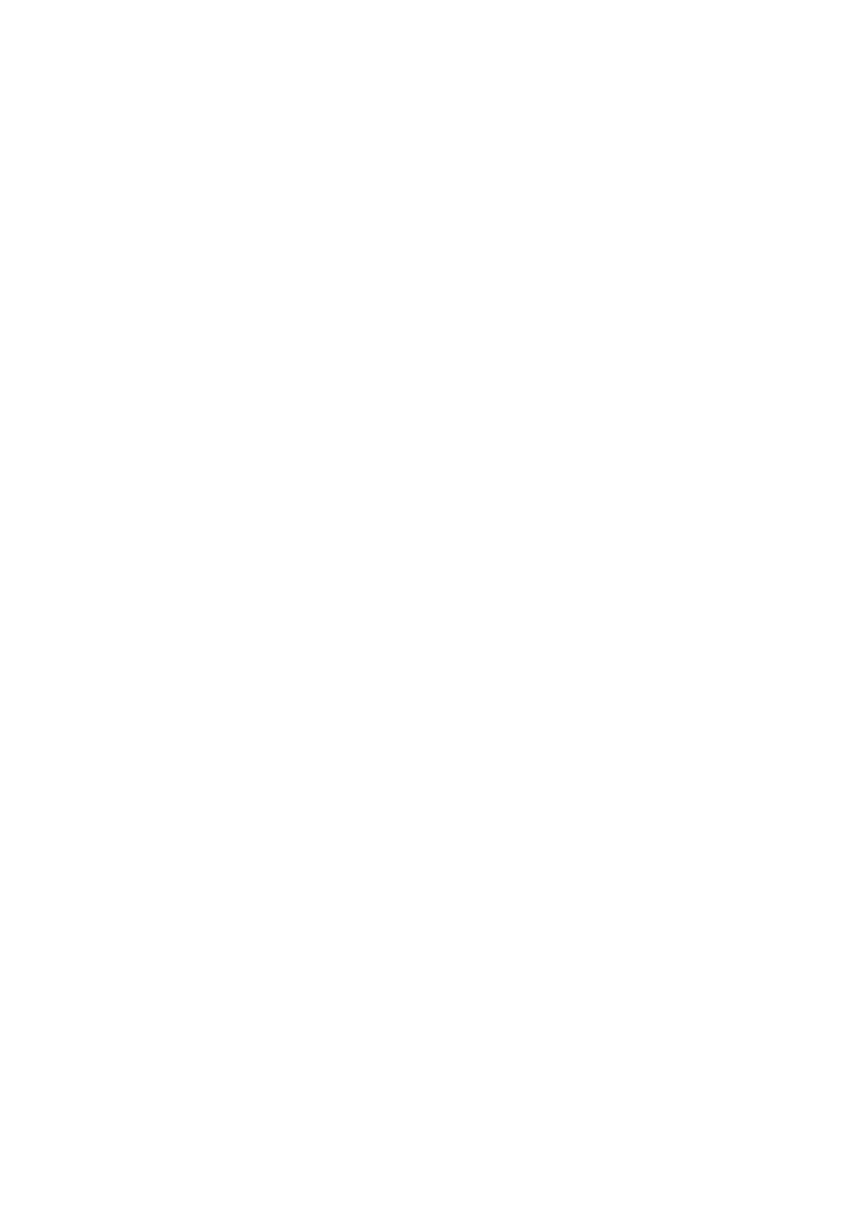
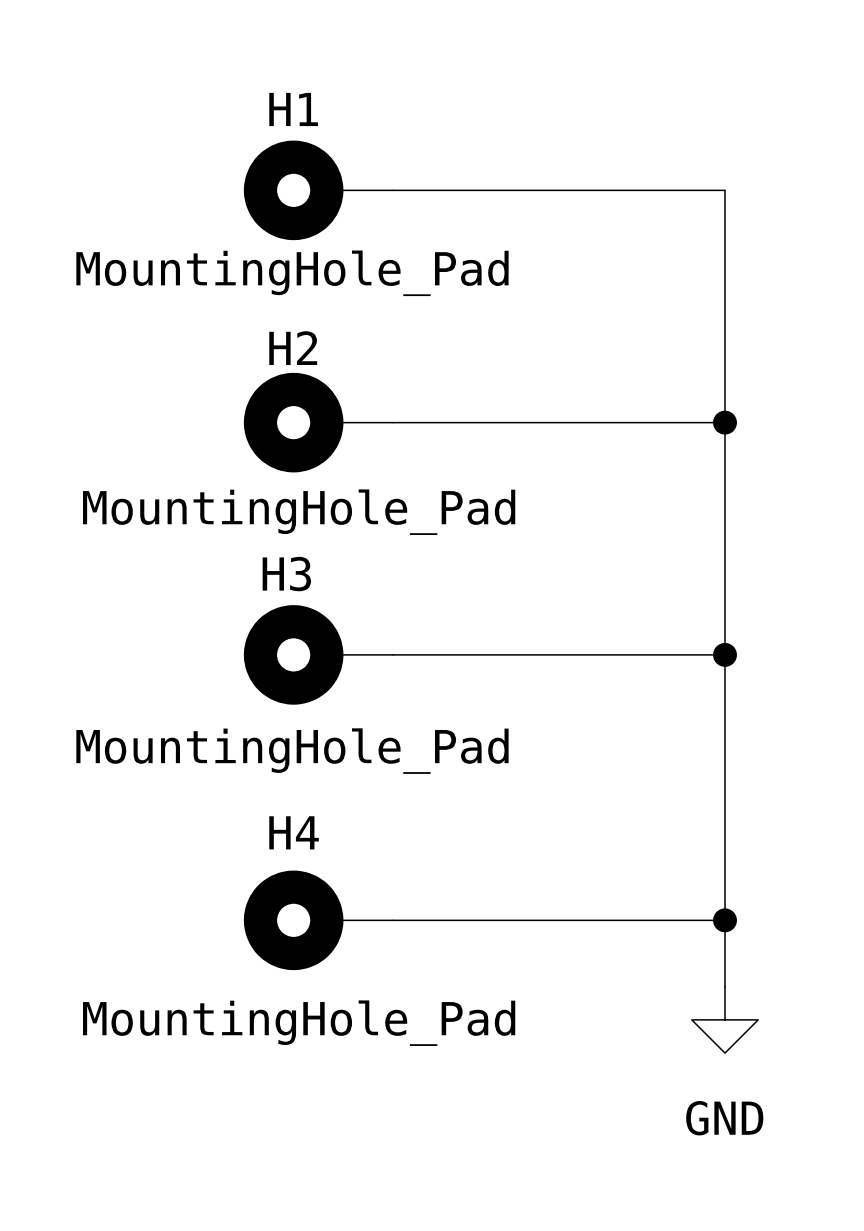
H1: none -> MountingHole_Pad (318, 190)
wire: none -> (393, 190) (725, 190) (725, 986)
H2: none -> MountingHole_Pad (318, 422)
wire: none -> (393, 422) (725, 422)
junction: none -> (725, 422)
H3: none -> MountingHole_Pad (318, 654)
wire: none -> (393, 654) (725, 654)
junction: none -> (725, 654)
H4: none -> MountingHole_Pad (318, 920)
wire: none -> (393, 920) (725, 920)
junction: none -> (725, 920)
power symbol: none -> GND (725, 1019)

